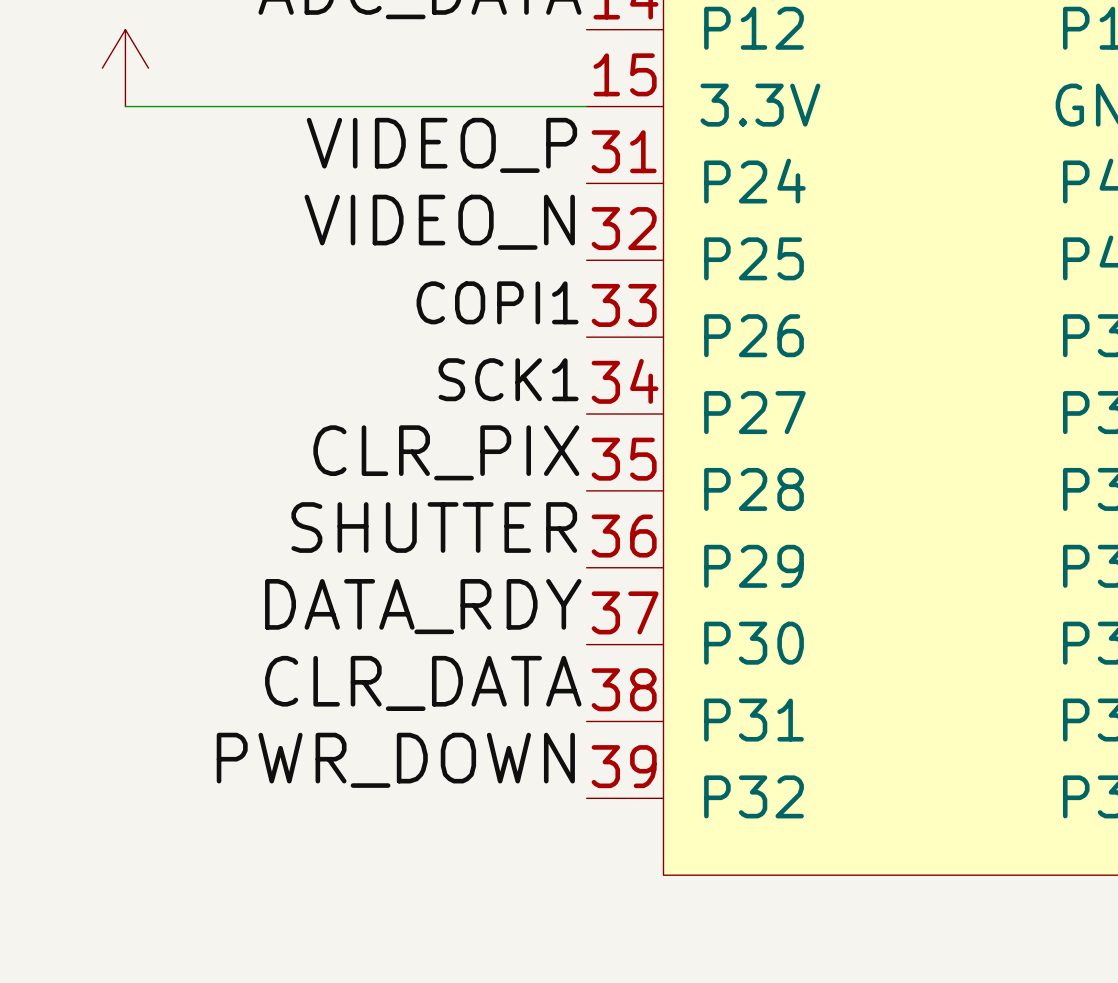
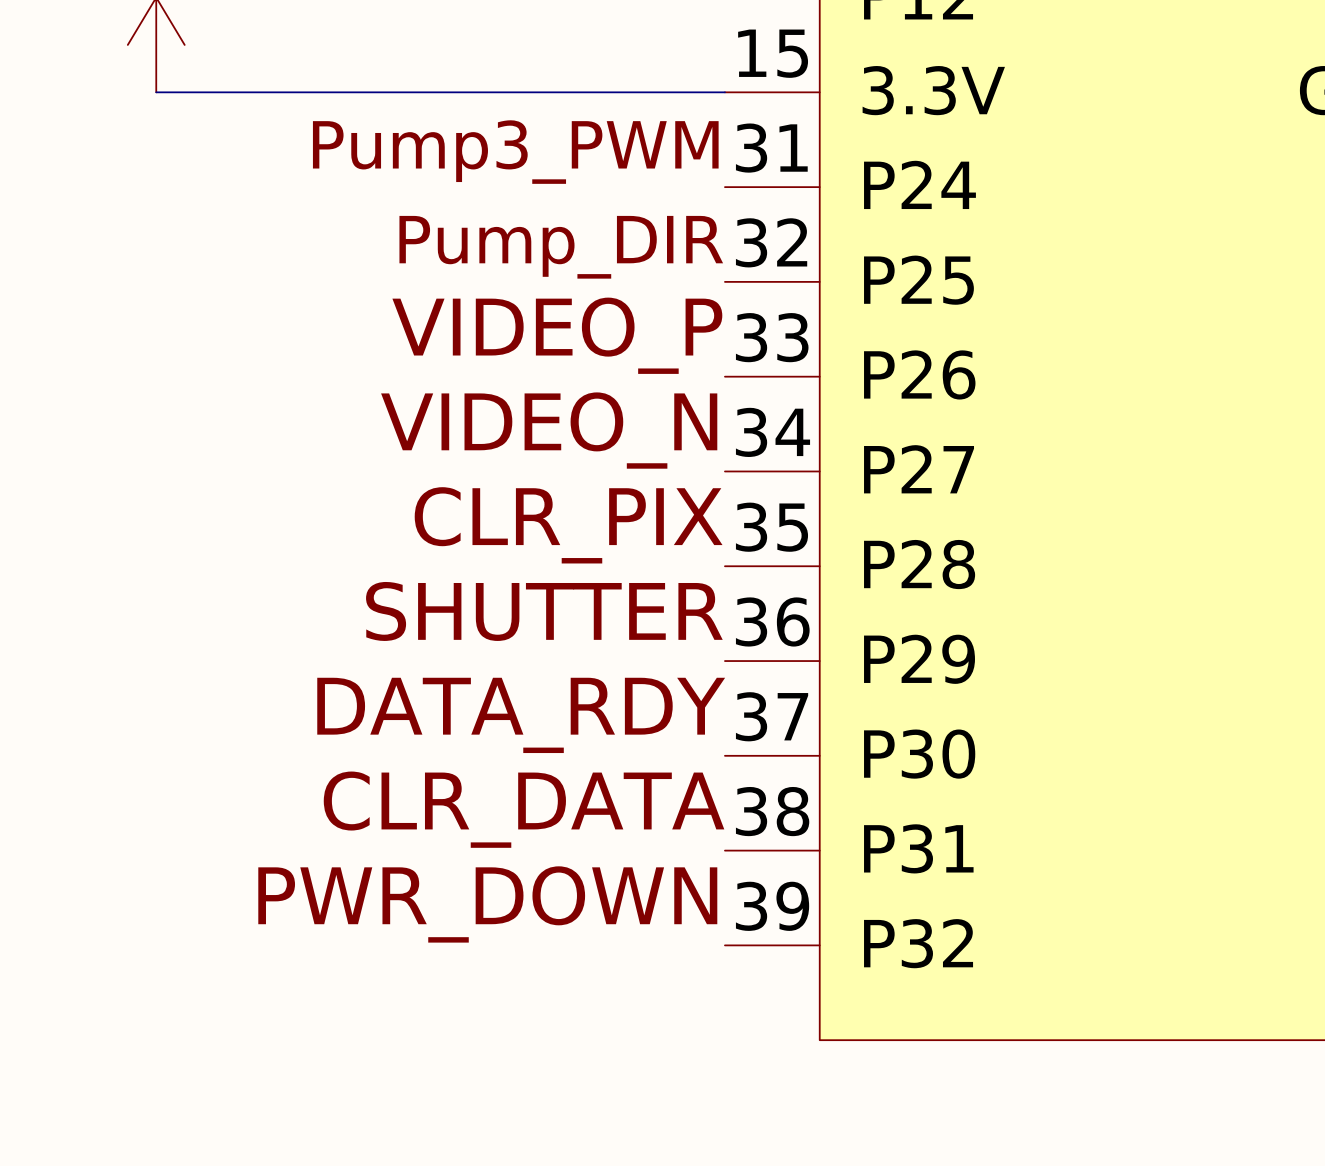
label: VIDEO_P (441, 145) -> Pump3_PWM (515, 152)
label: VIDEO_N (439, 222) -> Pump_DIR (561, 247)
label: COPI1 (497, 302) -> VIDEO_P (557, 335)
label: SCK1 (508, 379) -> VIDEO_N (549, 430)

